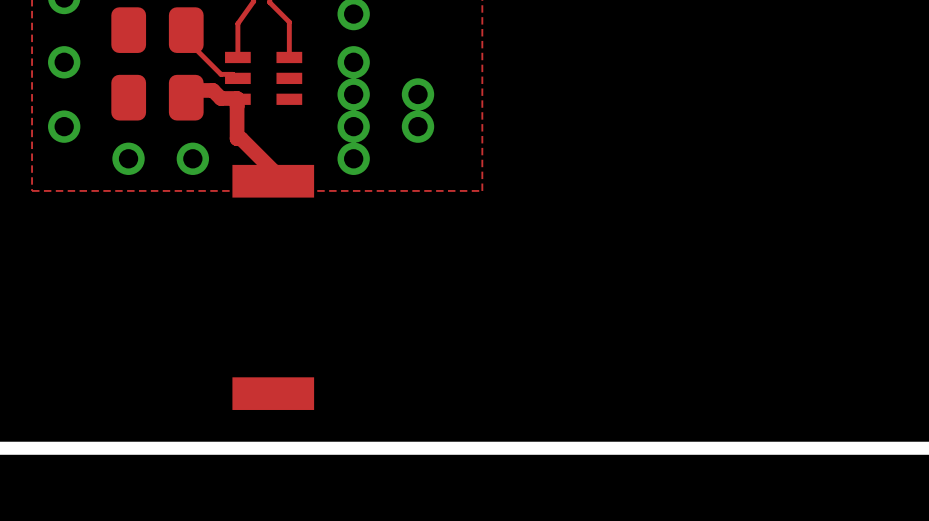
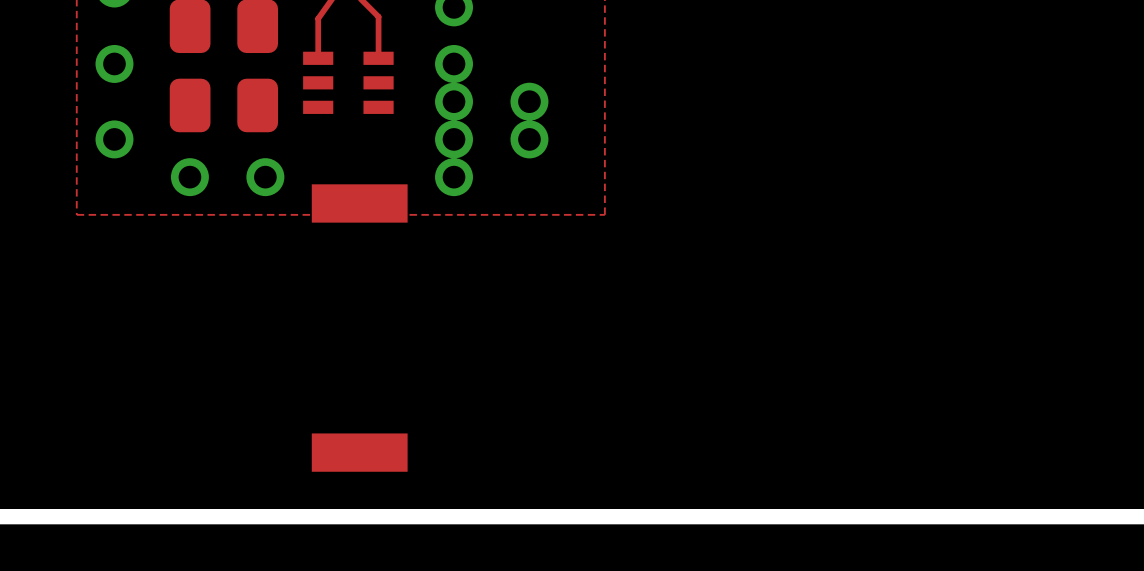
top track: (186, 30) (188, 30) (188, 42) (221, 74) (233, 74) (237, 78) -> none
top track: (186, 97) (192, 90) (212, 90) (221, 98) (237, 98) (237, 138) (241, 138) (273, 170) (273, 181) -> none

